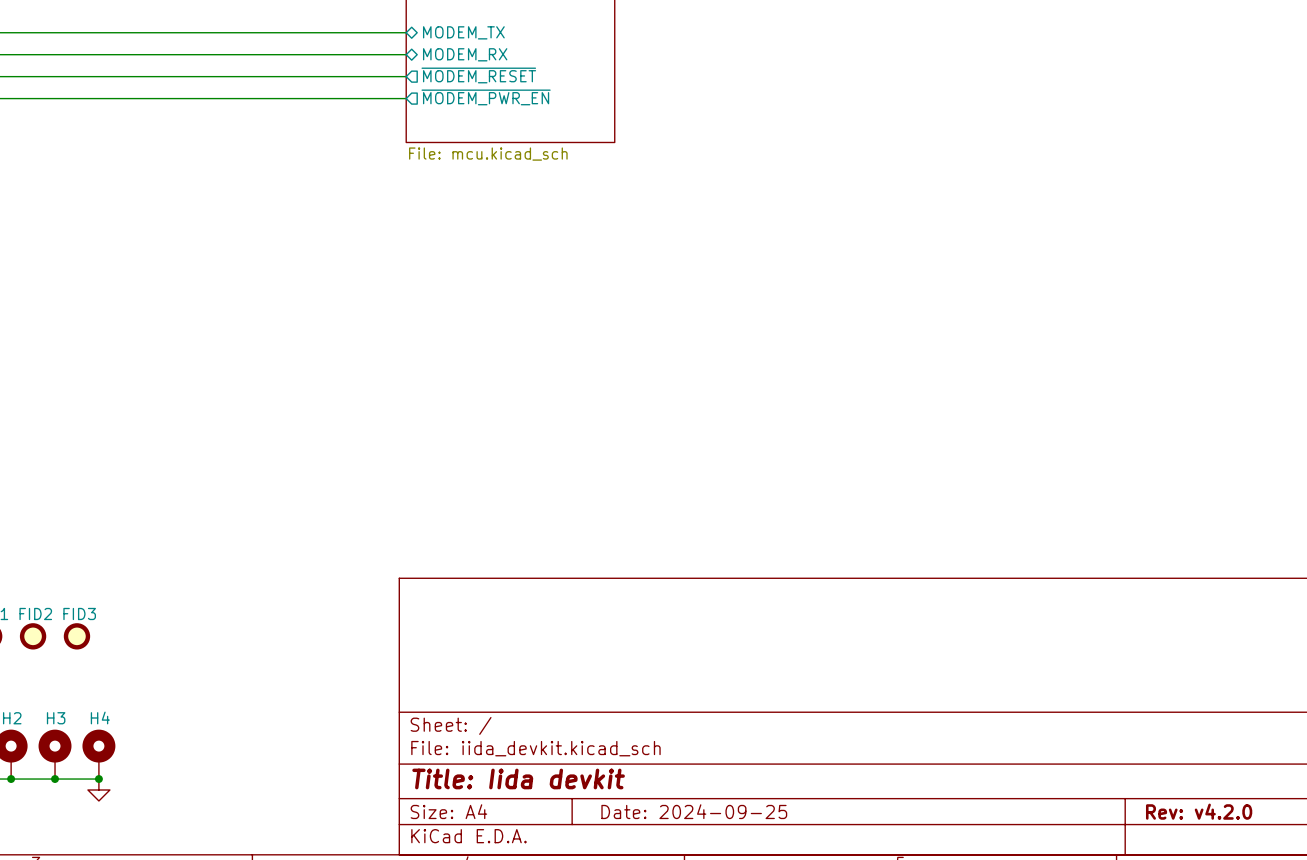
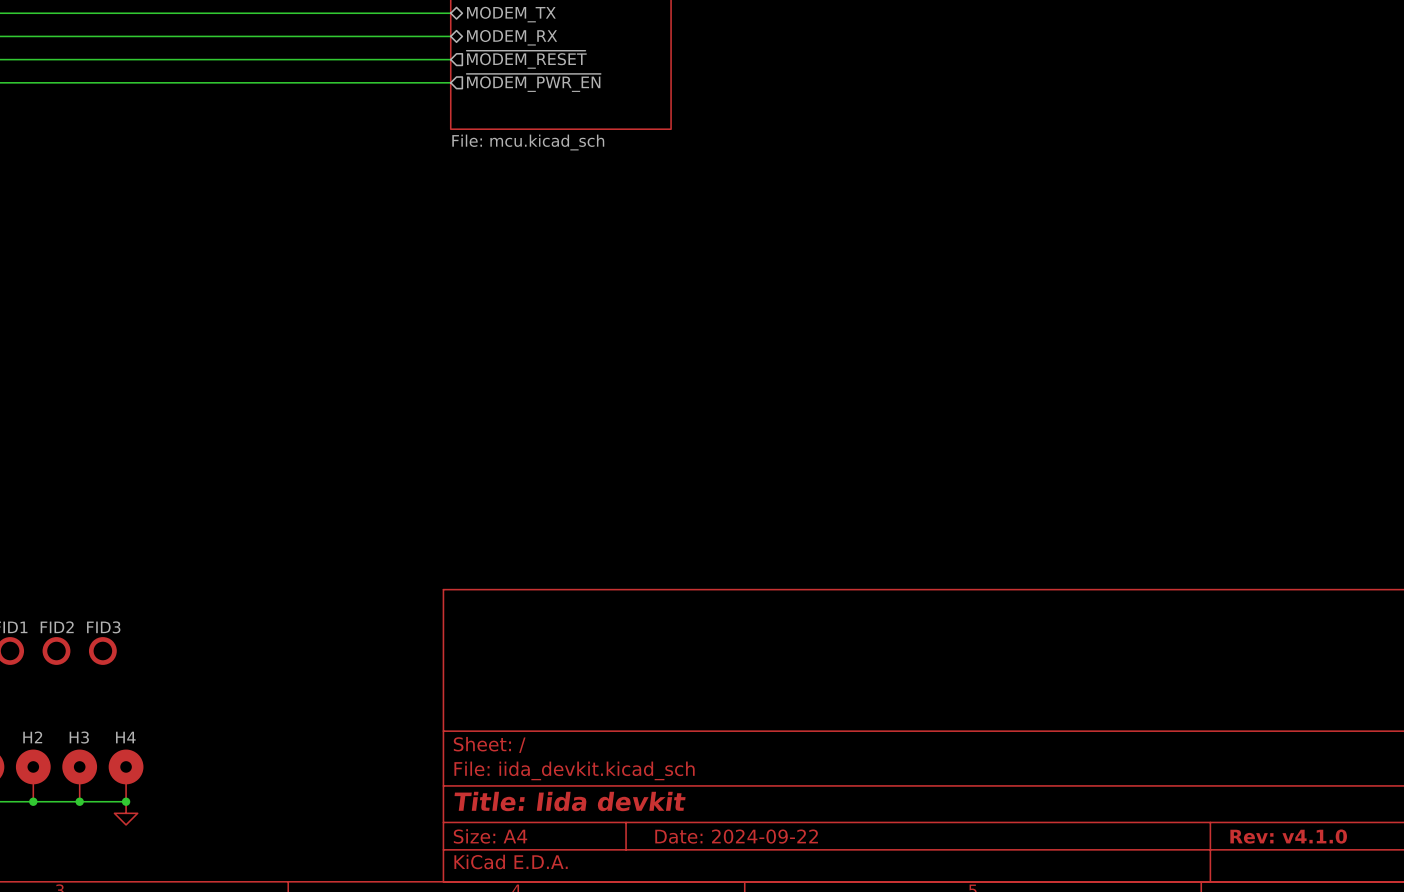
title block: Date: 2024-09-25 (694, 811) -> Date: 2024-09-22 (736, 836)
title block: Rev: v4.2.0 (1199, 811) -> Rev: v4.1.0 (1288, 836)

